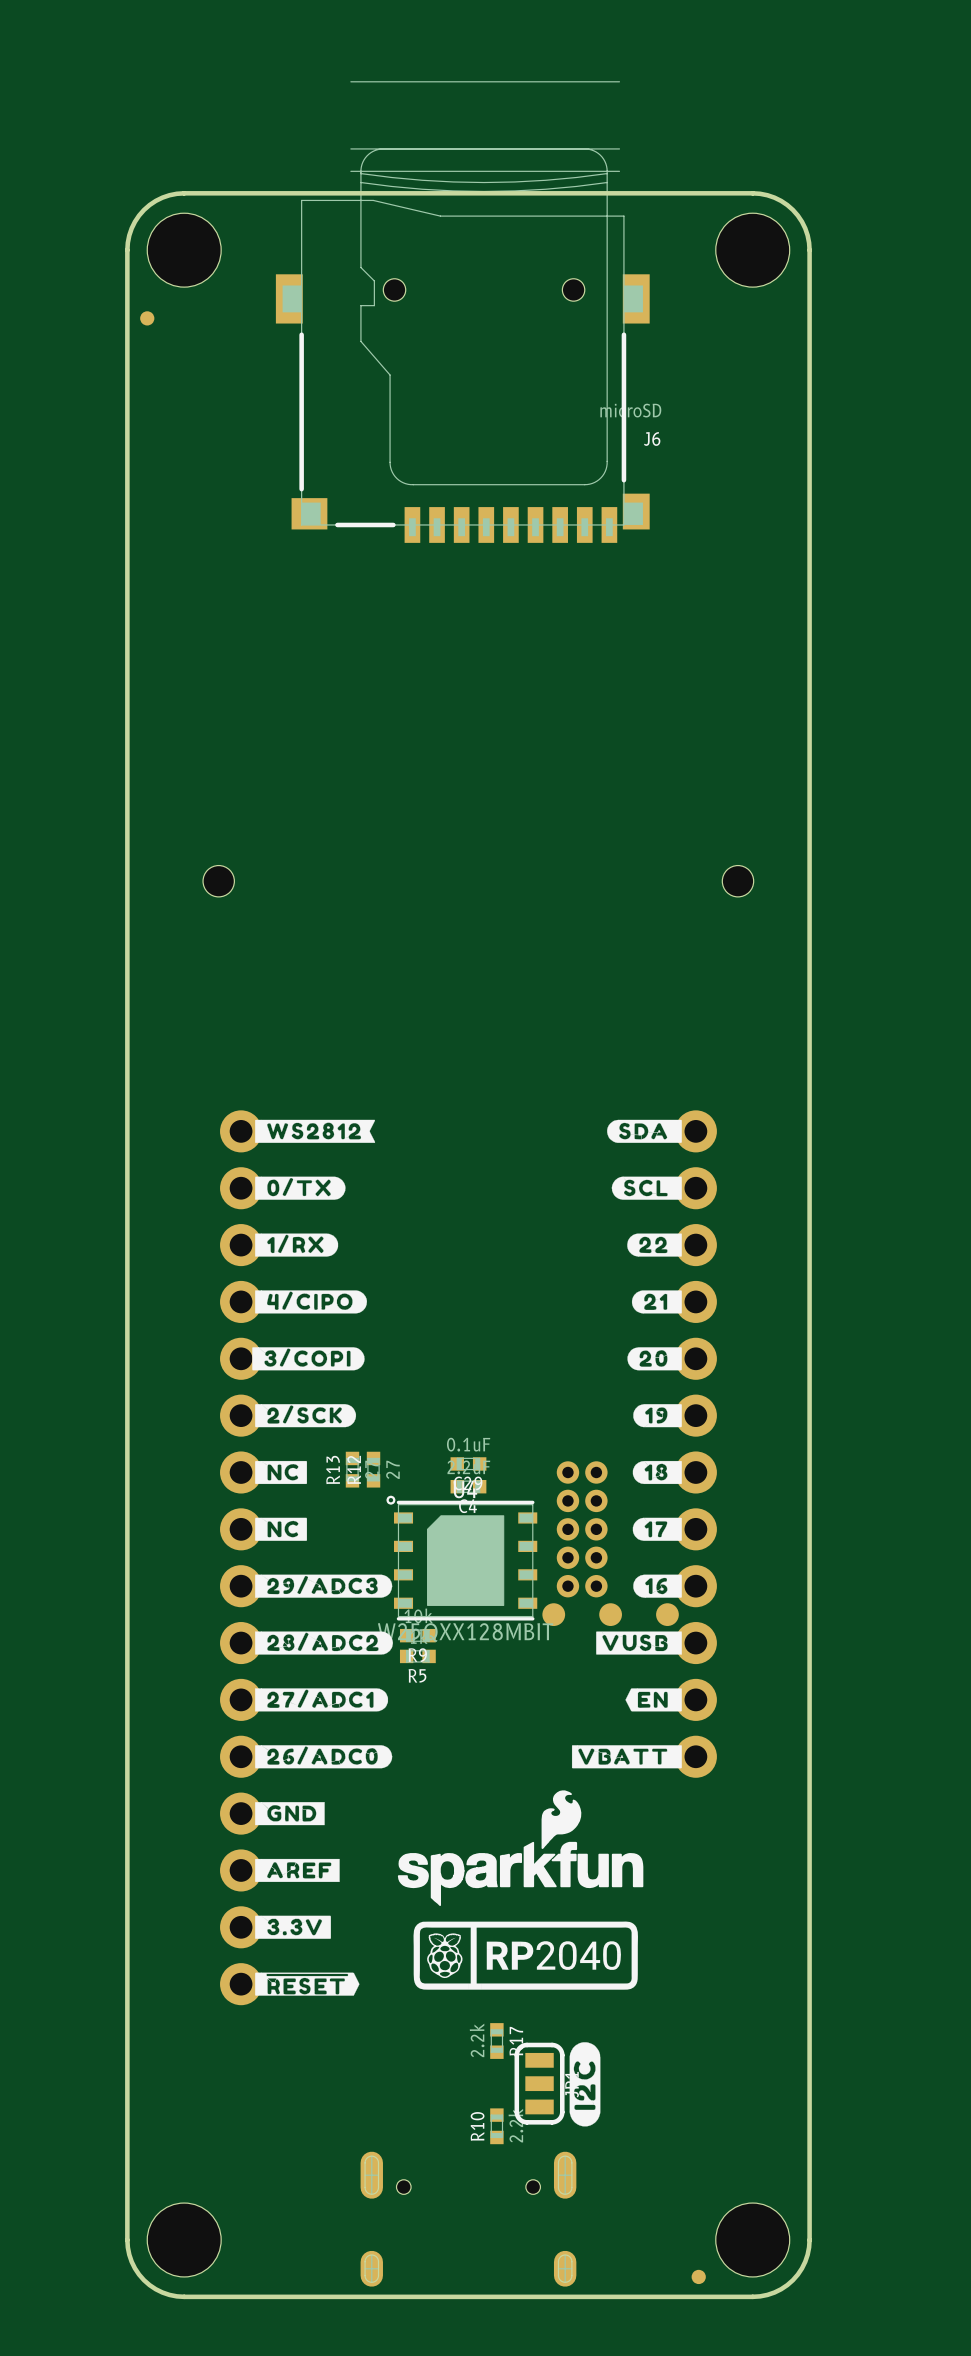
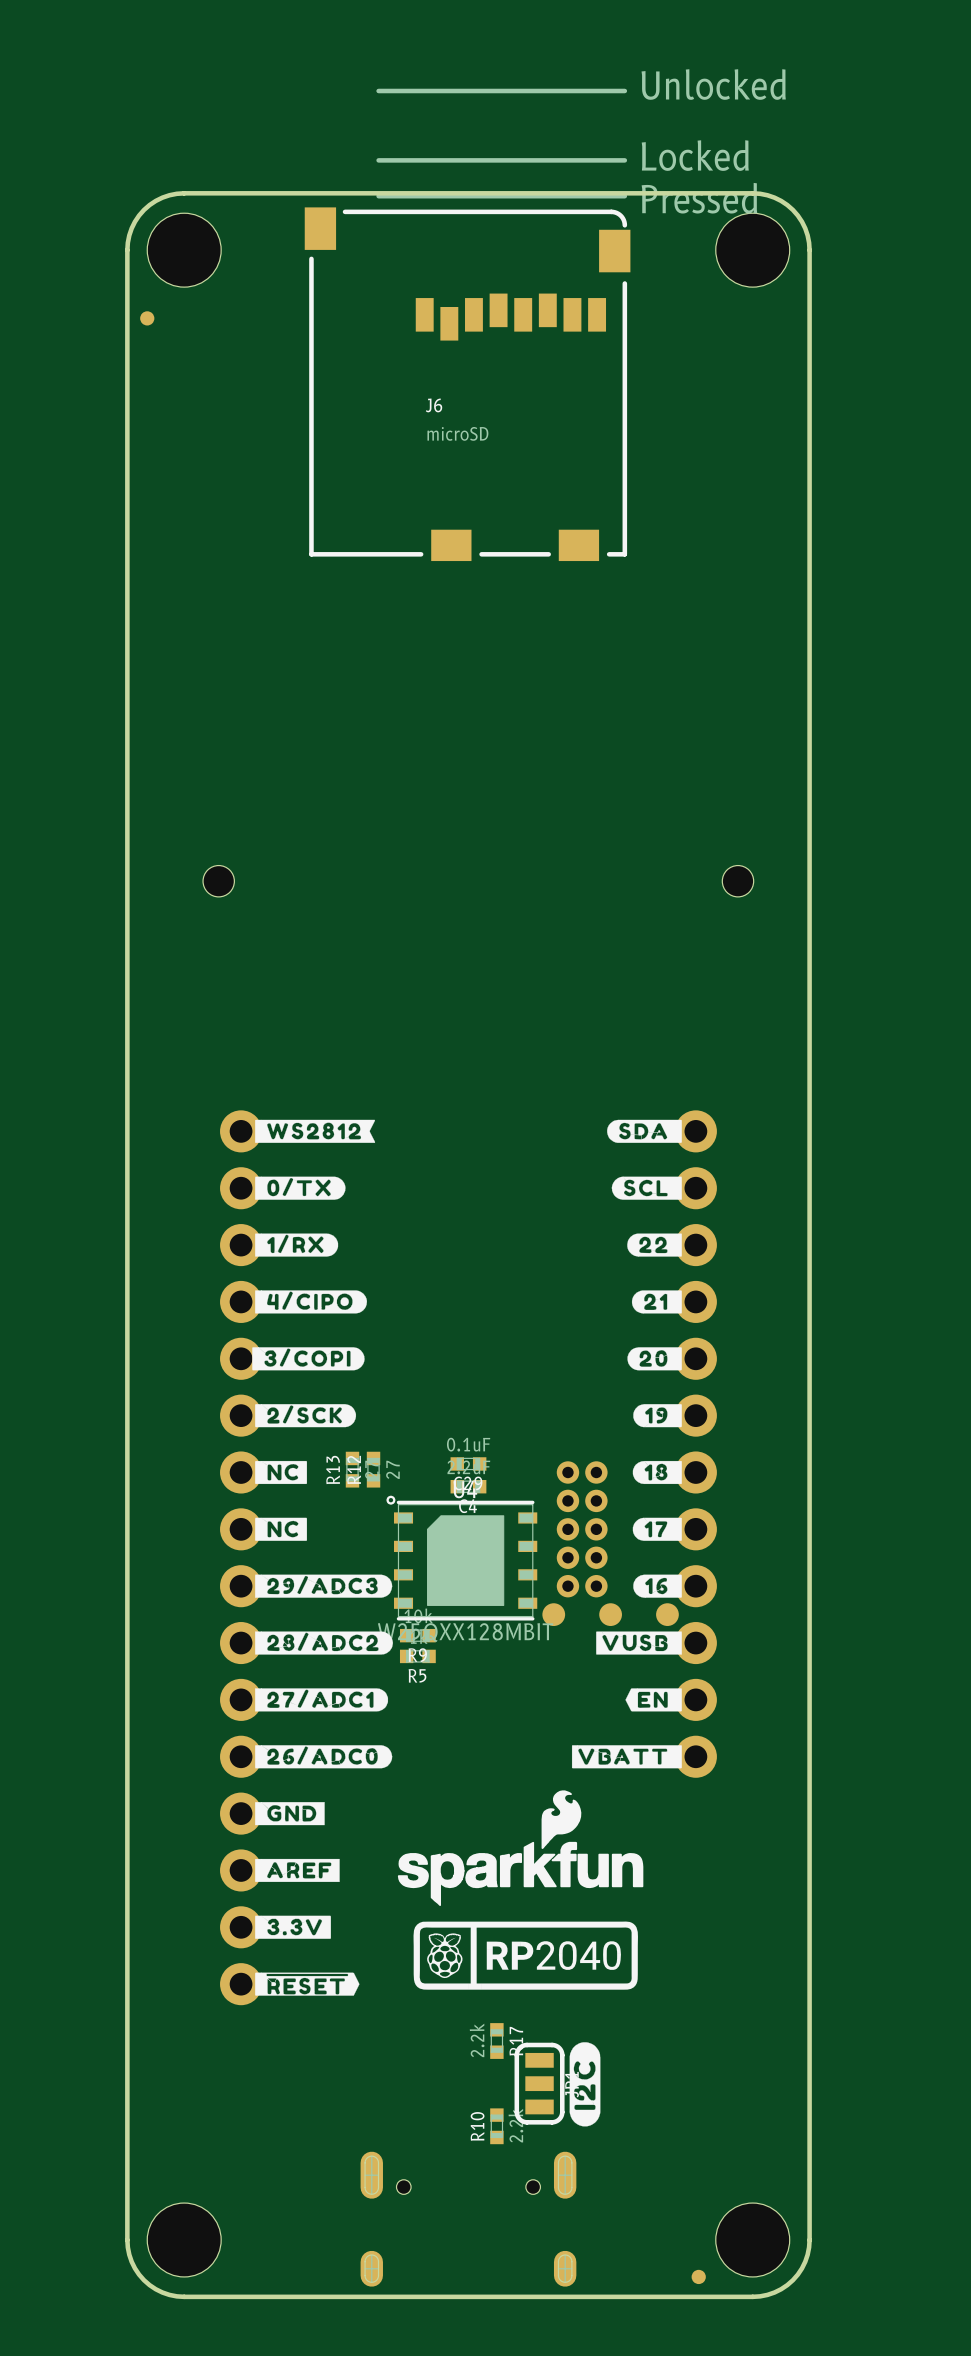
J6 footprint: [275, 81, 650, 543] -> [304, 88, 631, 562]
J6 value position: microSD (630, 410) -> microSD (457, 433)
J6 name position: J6 (652, 438) -> J6 (434, 405)

